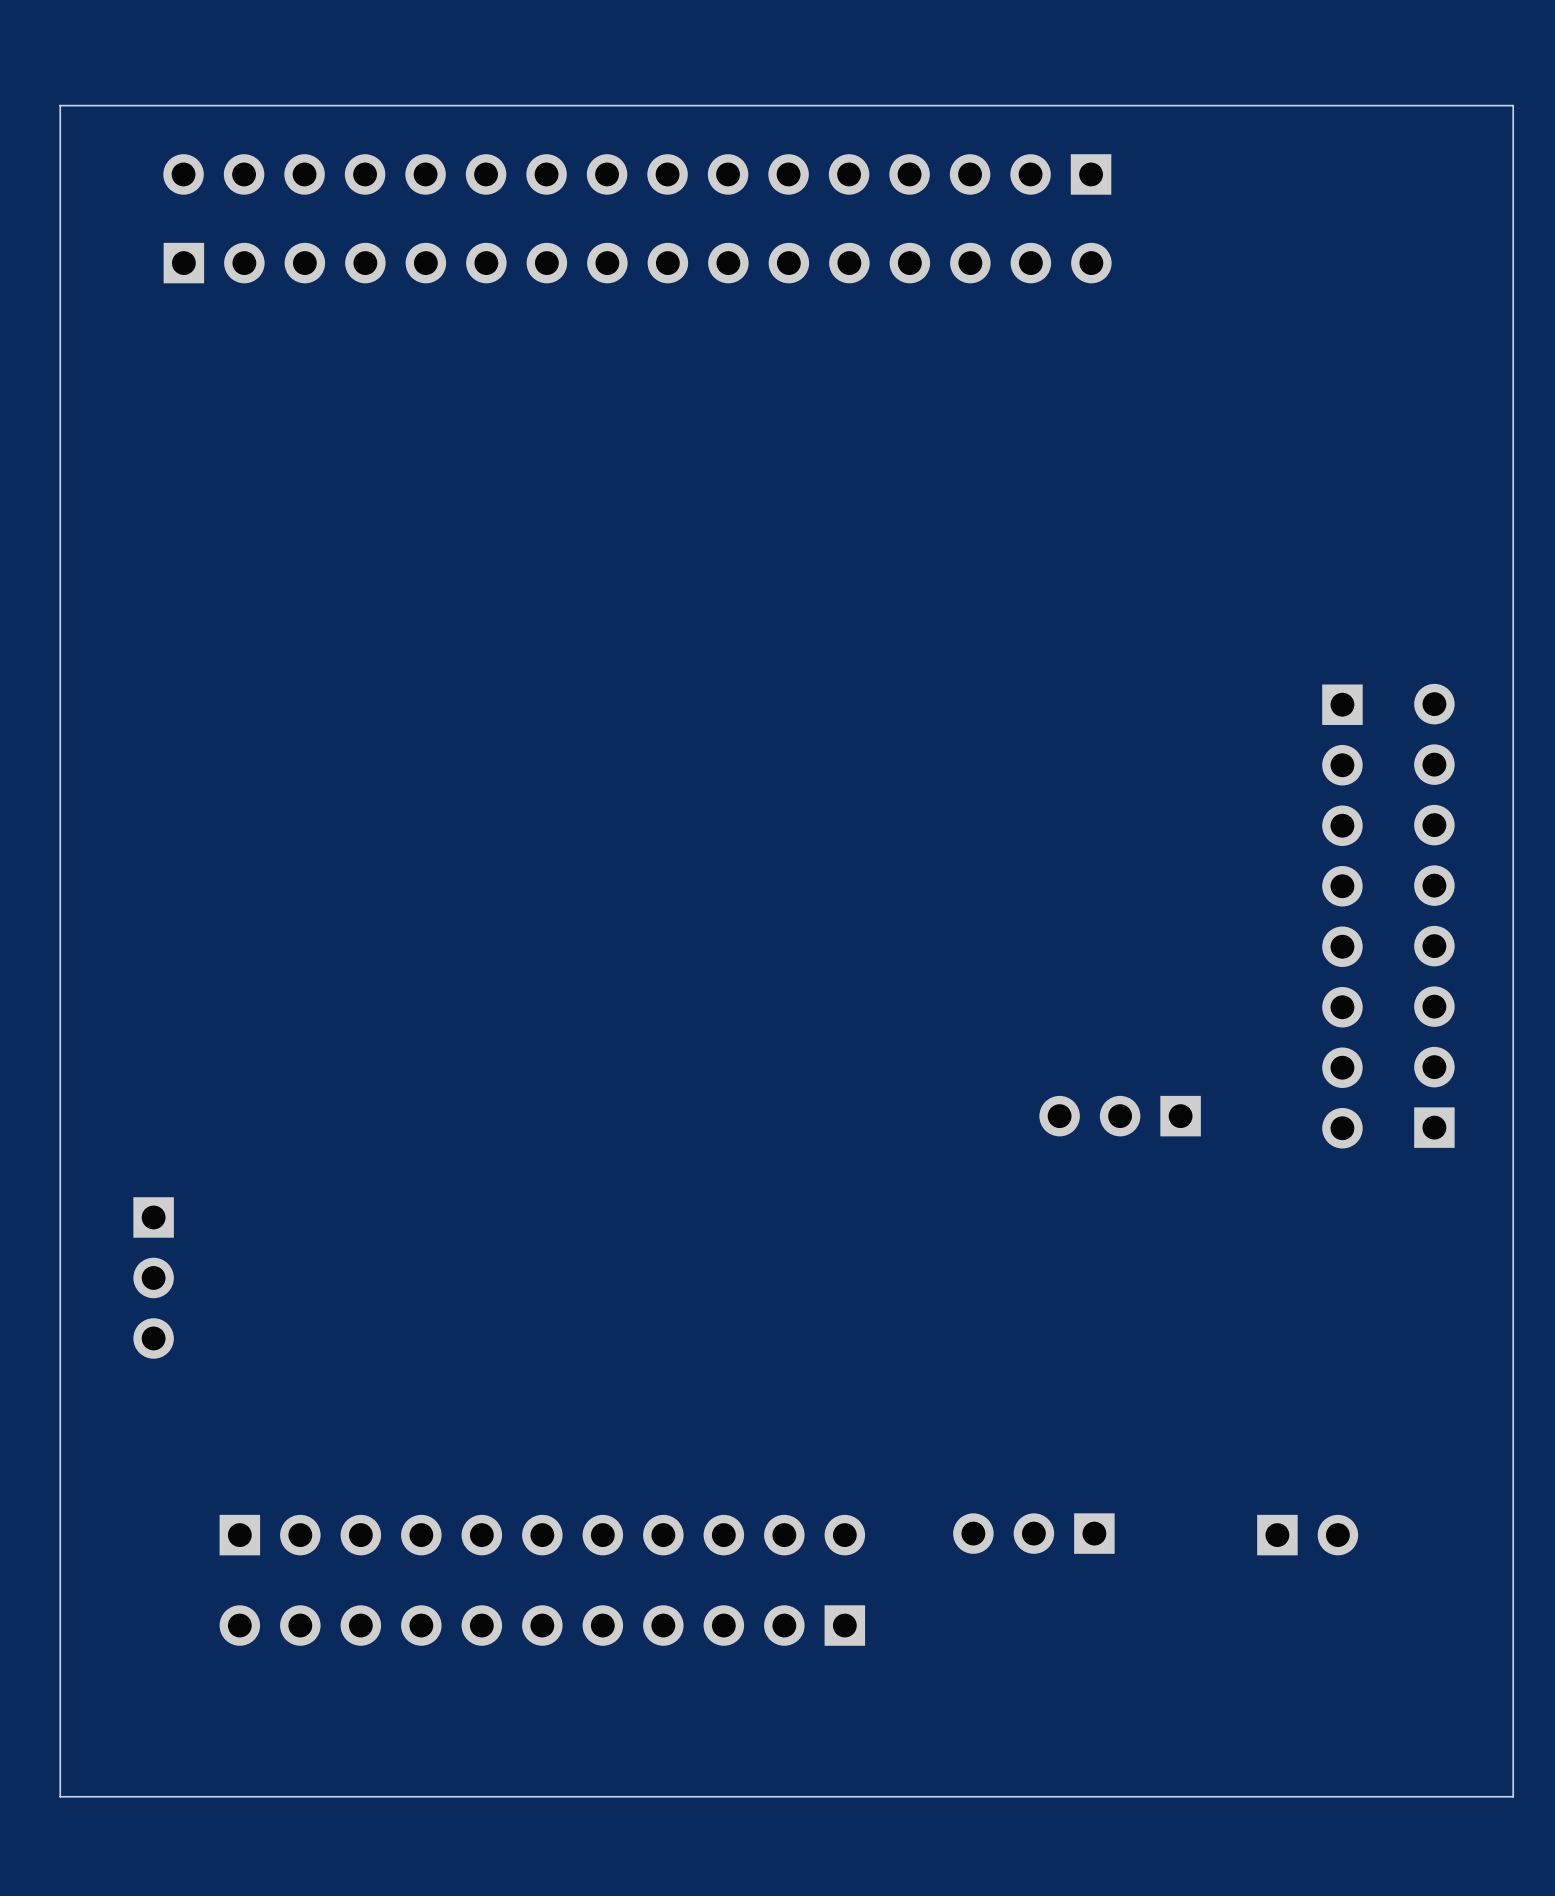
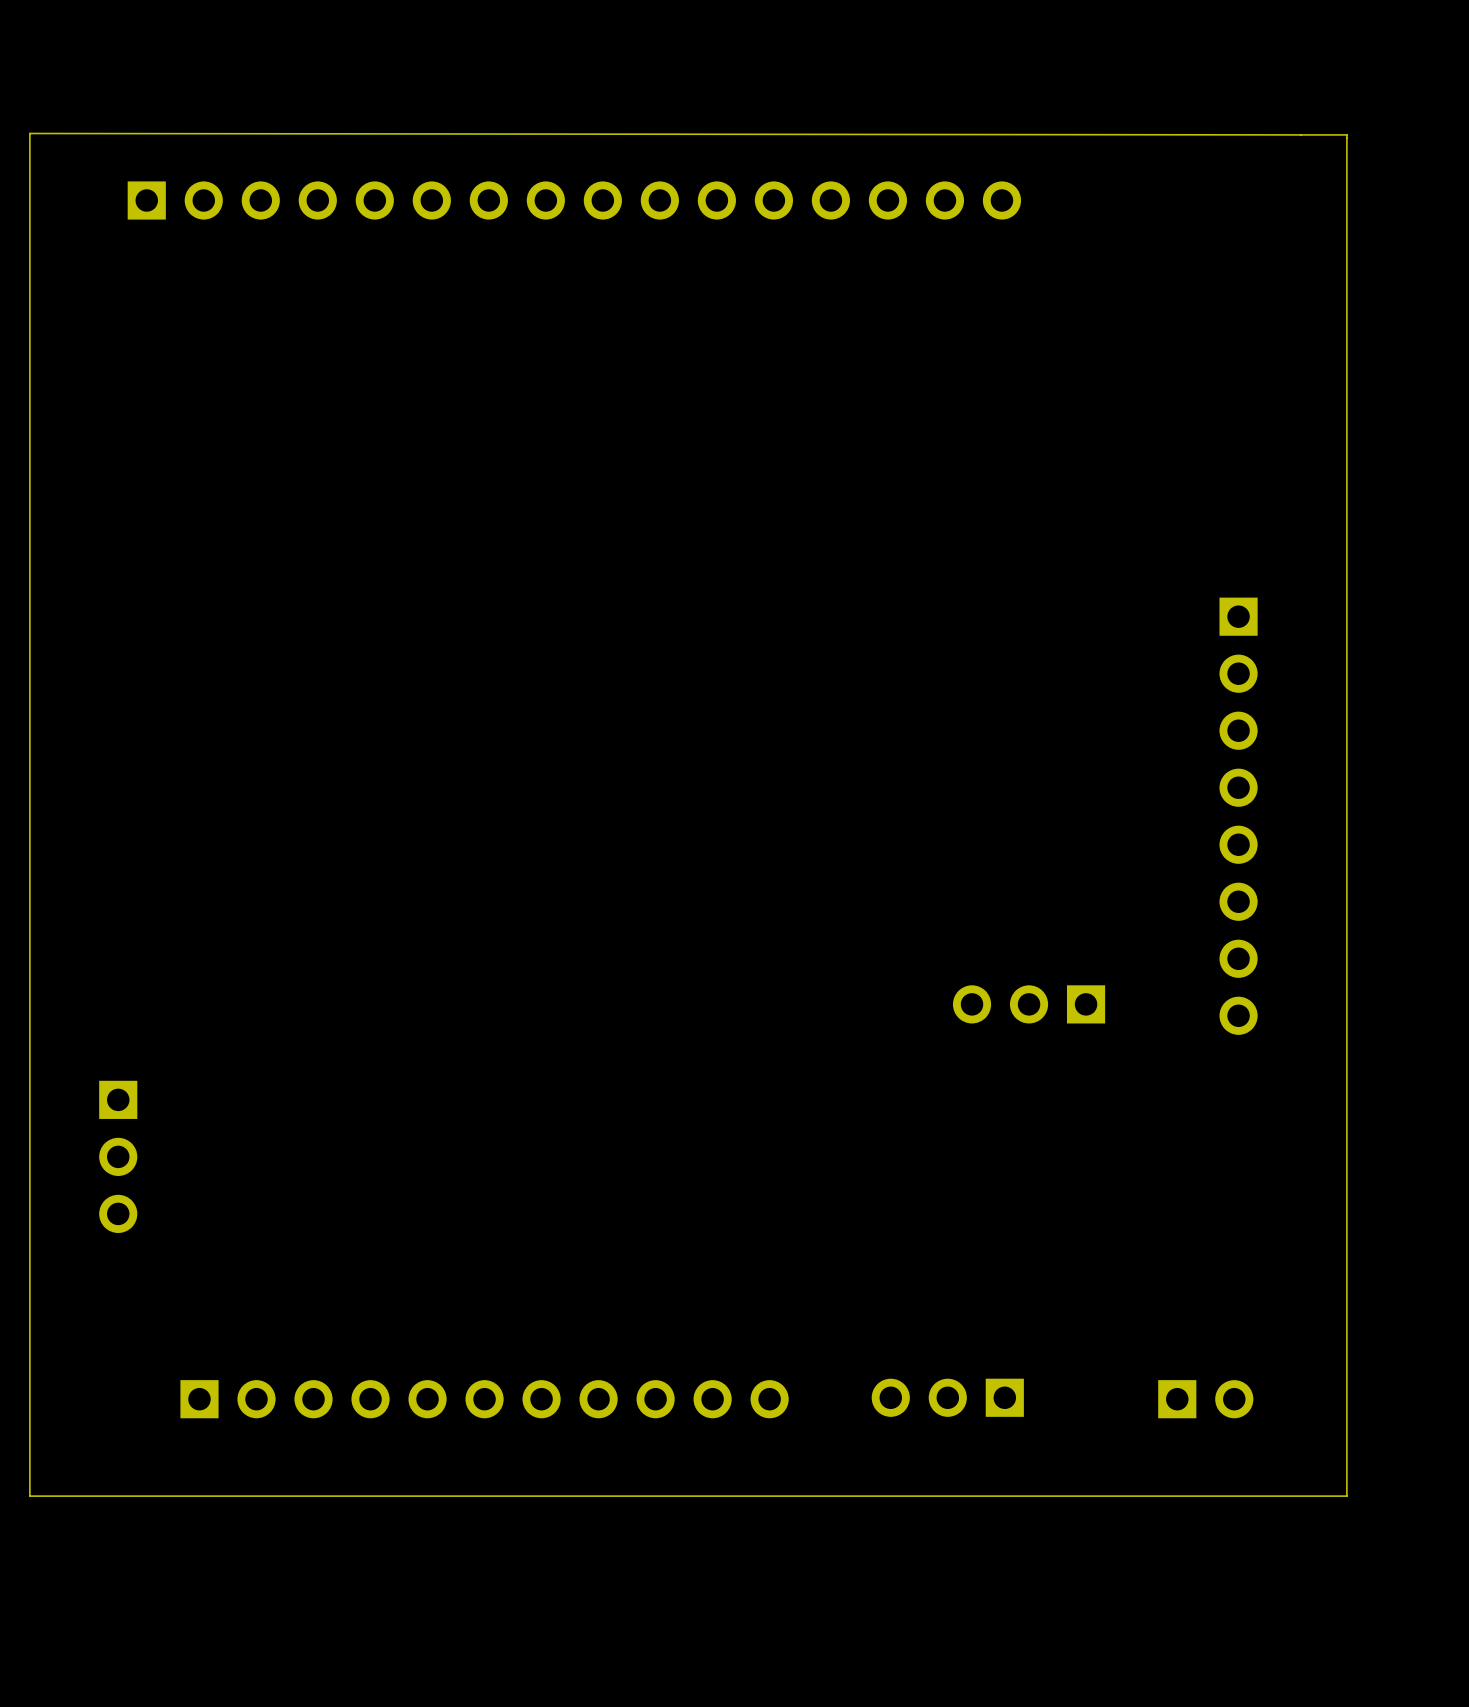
board edge: (1513, 105) (1513, 1796) (60, 1796) (60, 105) (1513, 105) -> (29, 133) (1346, 134) (1346, 1496) (29, 1496) (29, 133)
part: (637, 174) -> none
part: (1434, 915) -> none
part: (542, 1625) -> none

